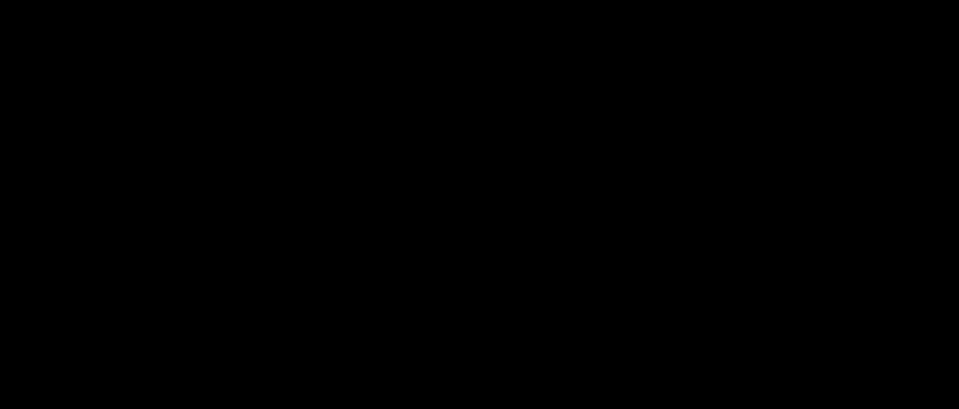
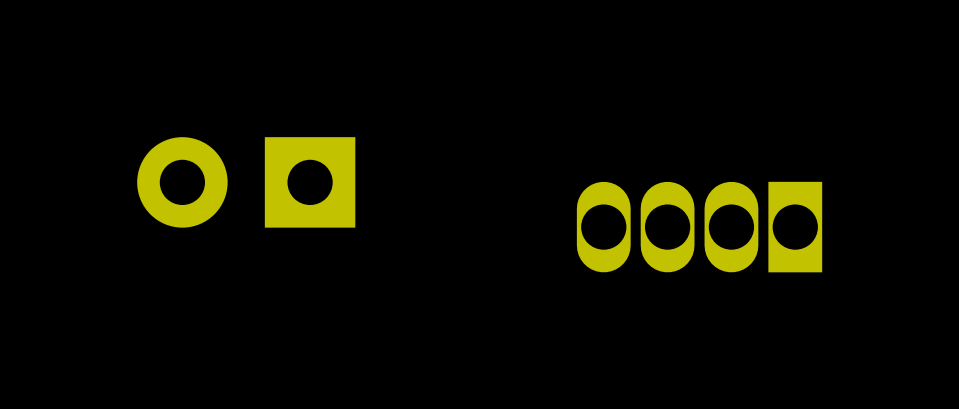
part: none -> (246, 182)
part: none -> (699, 227)

